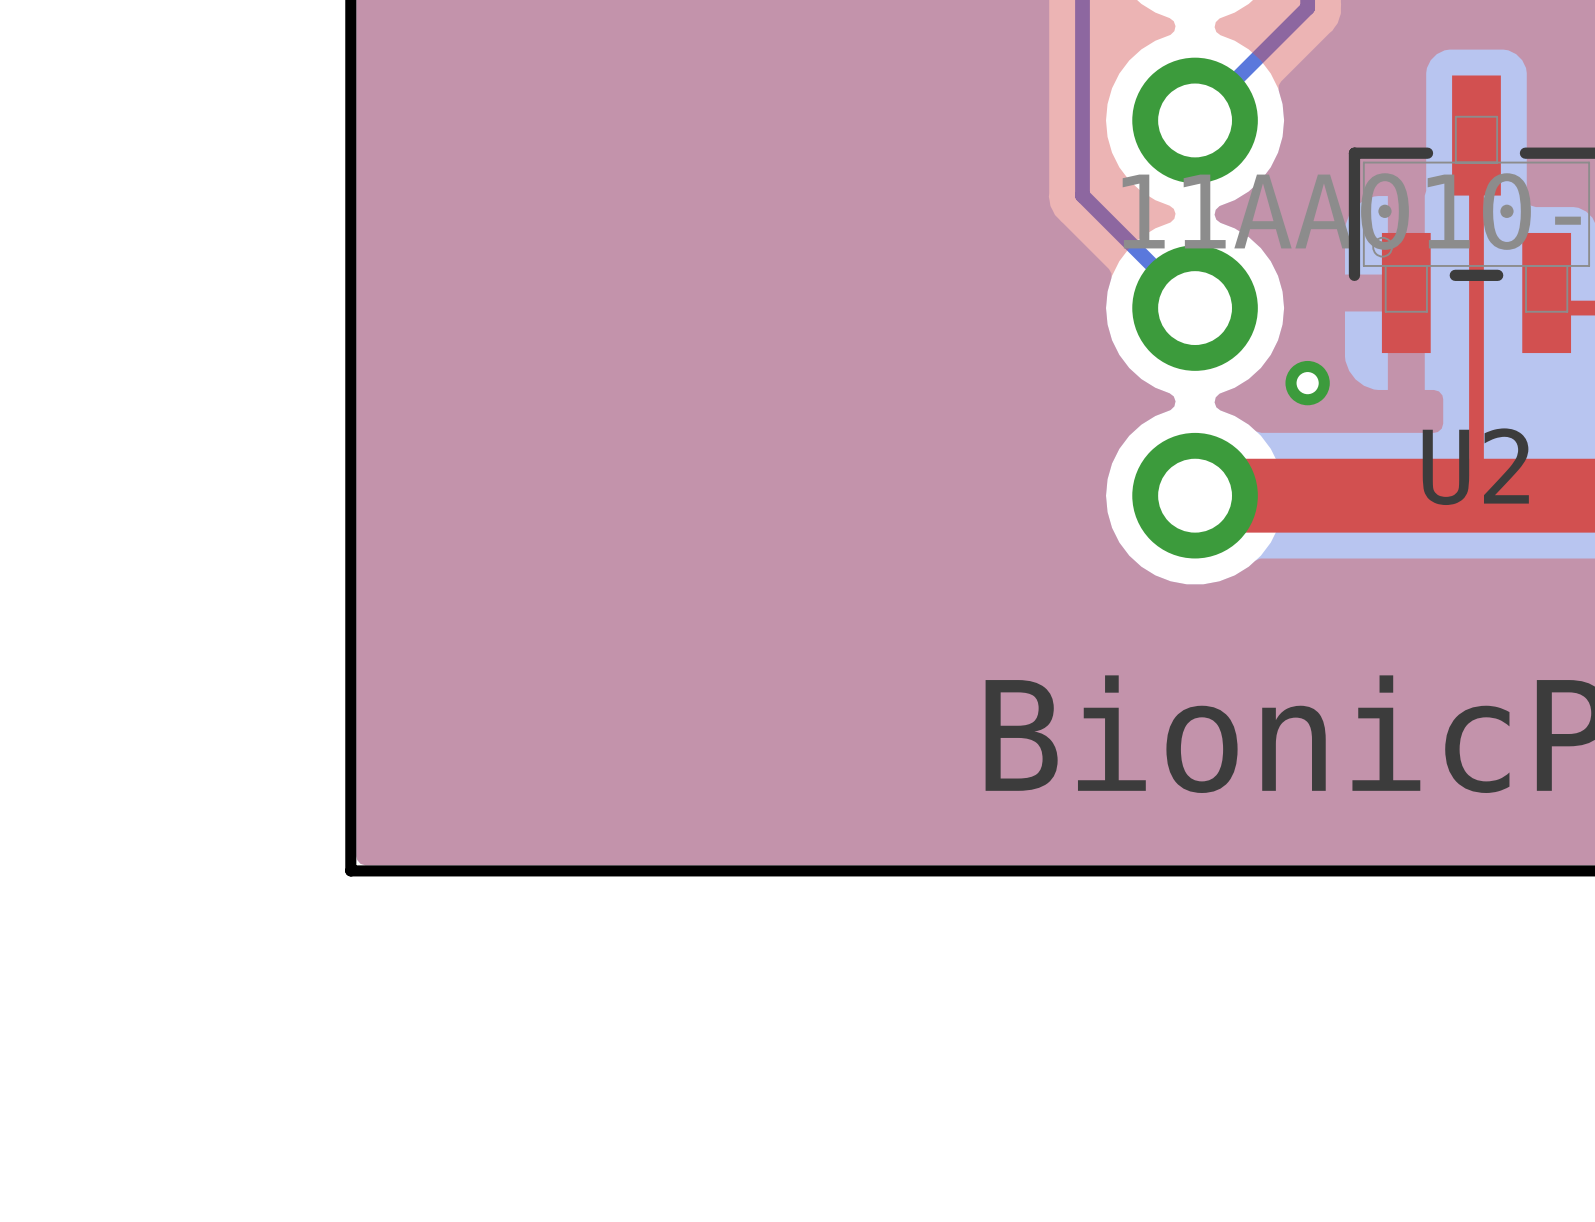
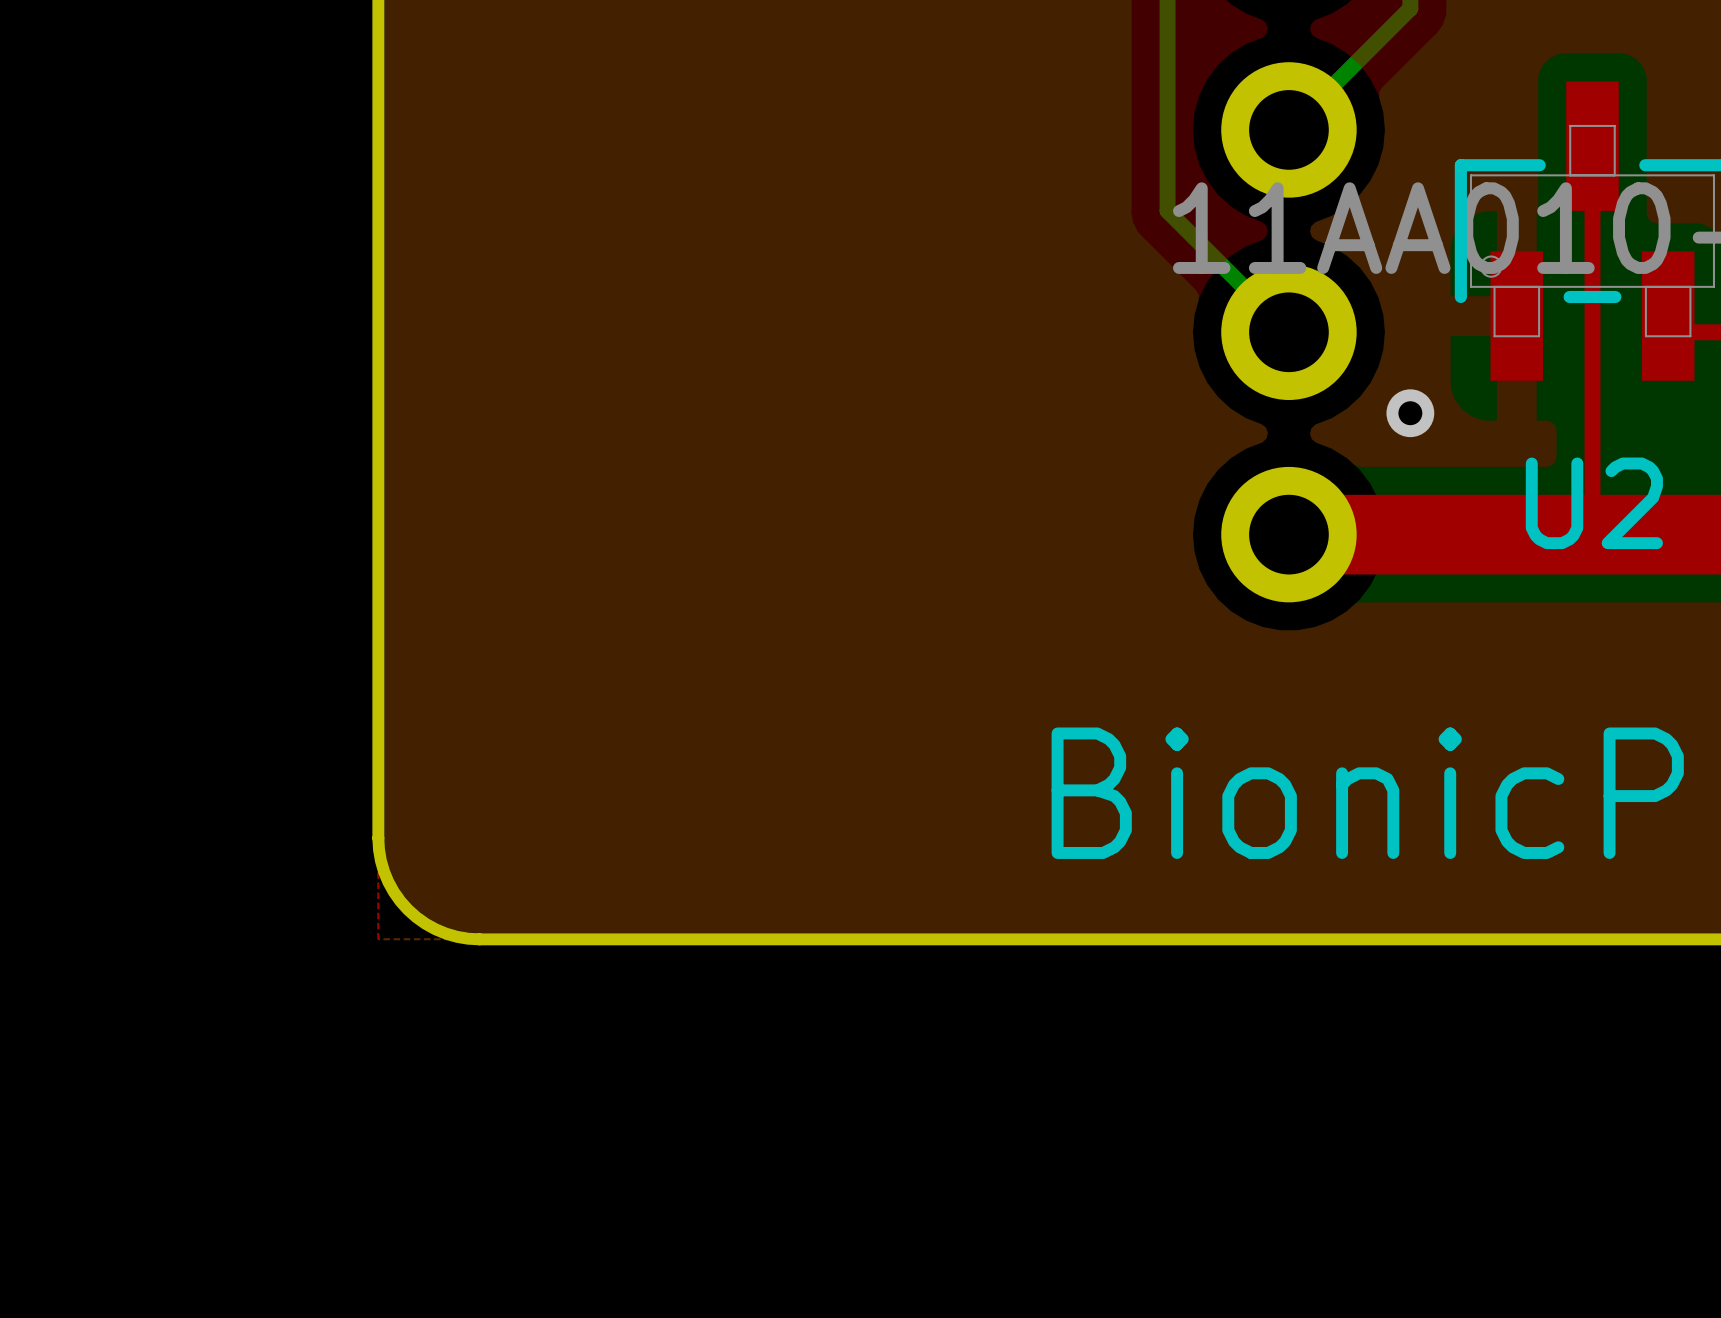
board edge: (350, 777) (350, 870) (444, 870) -> (378, 838) (384, 871) (393, 891) (408, 909) (435, 929) (457, 936) (479, 939)

